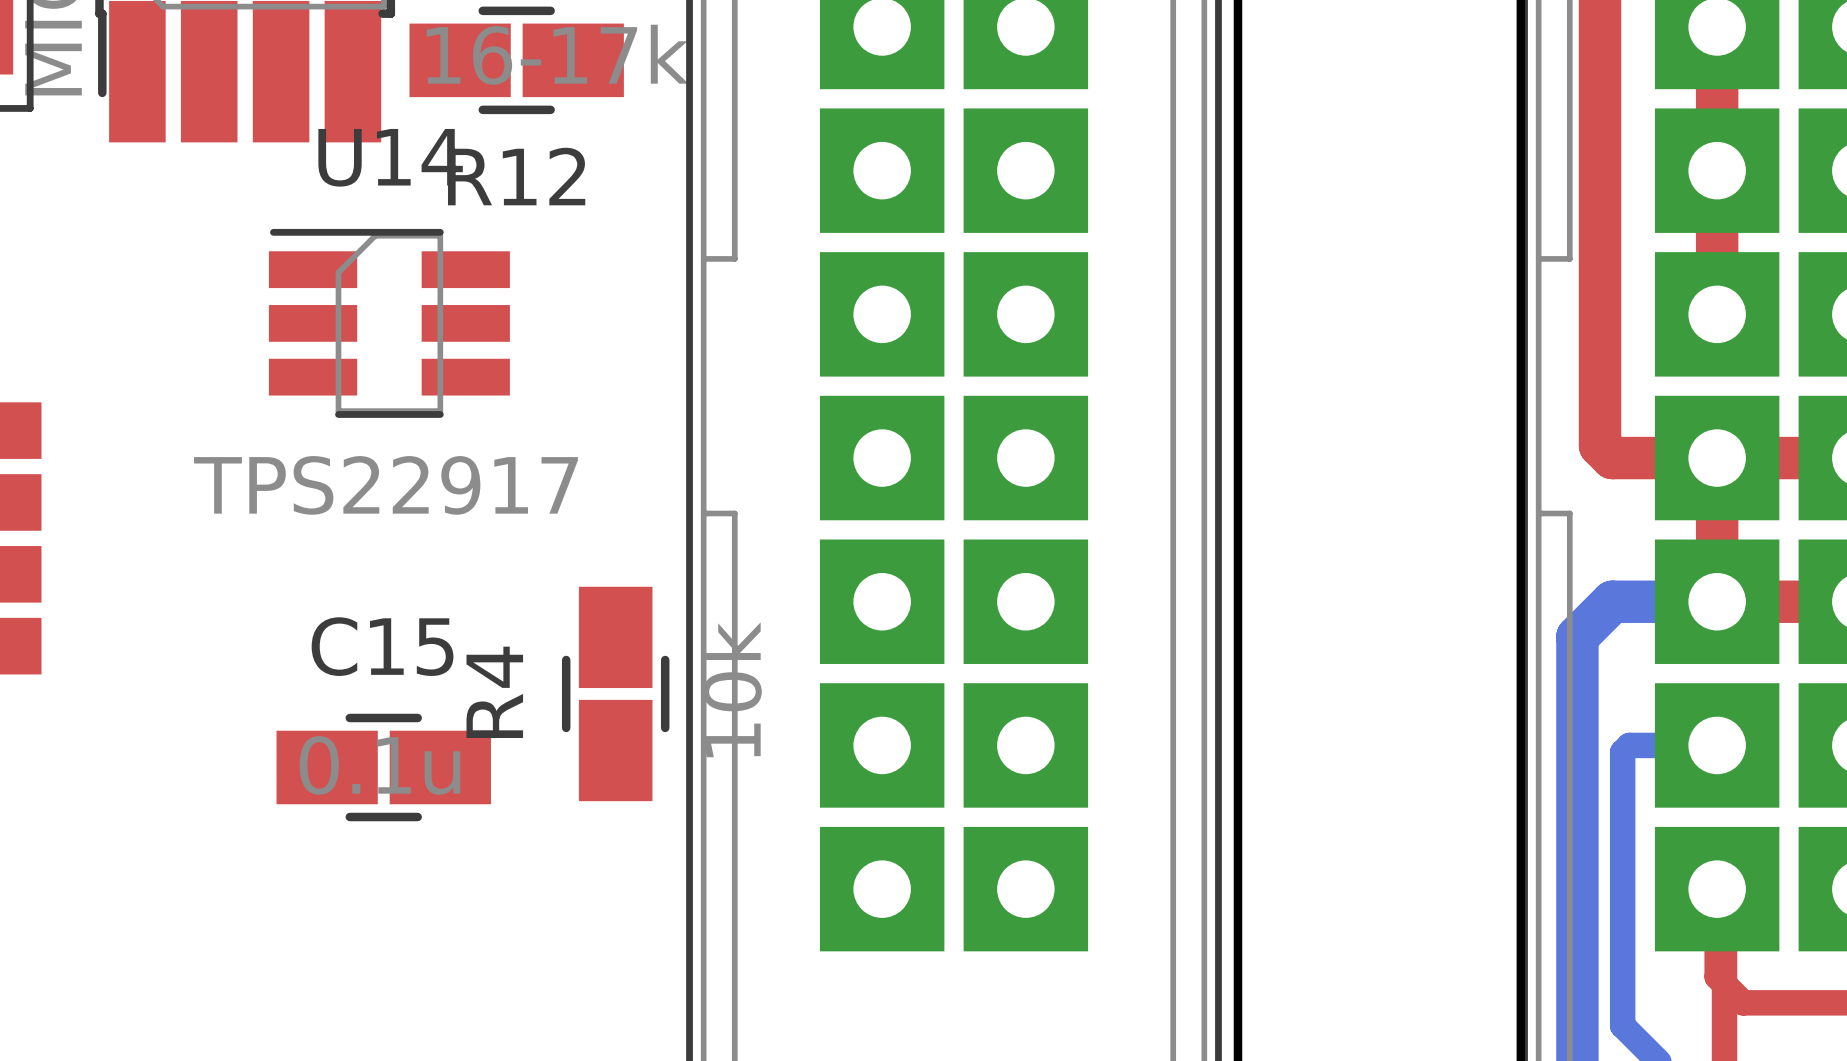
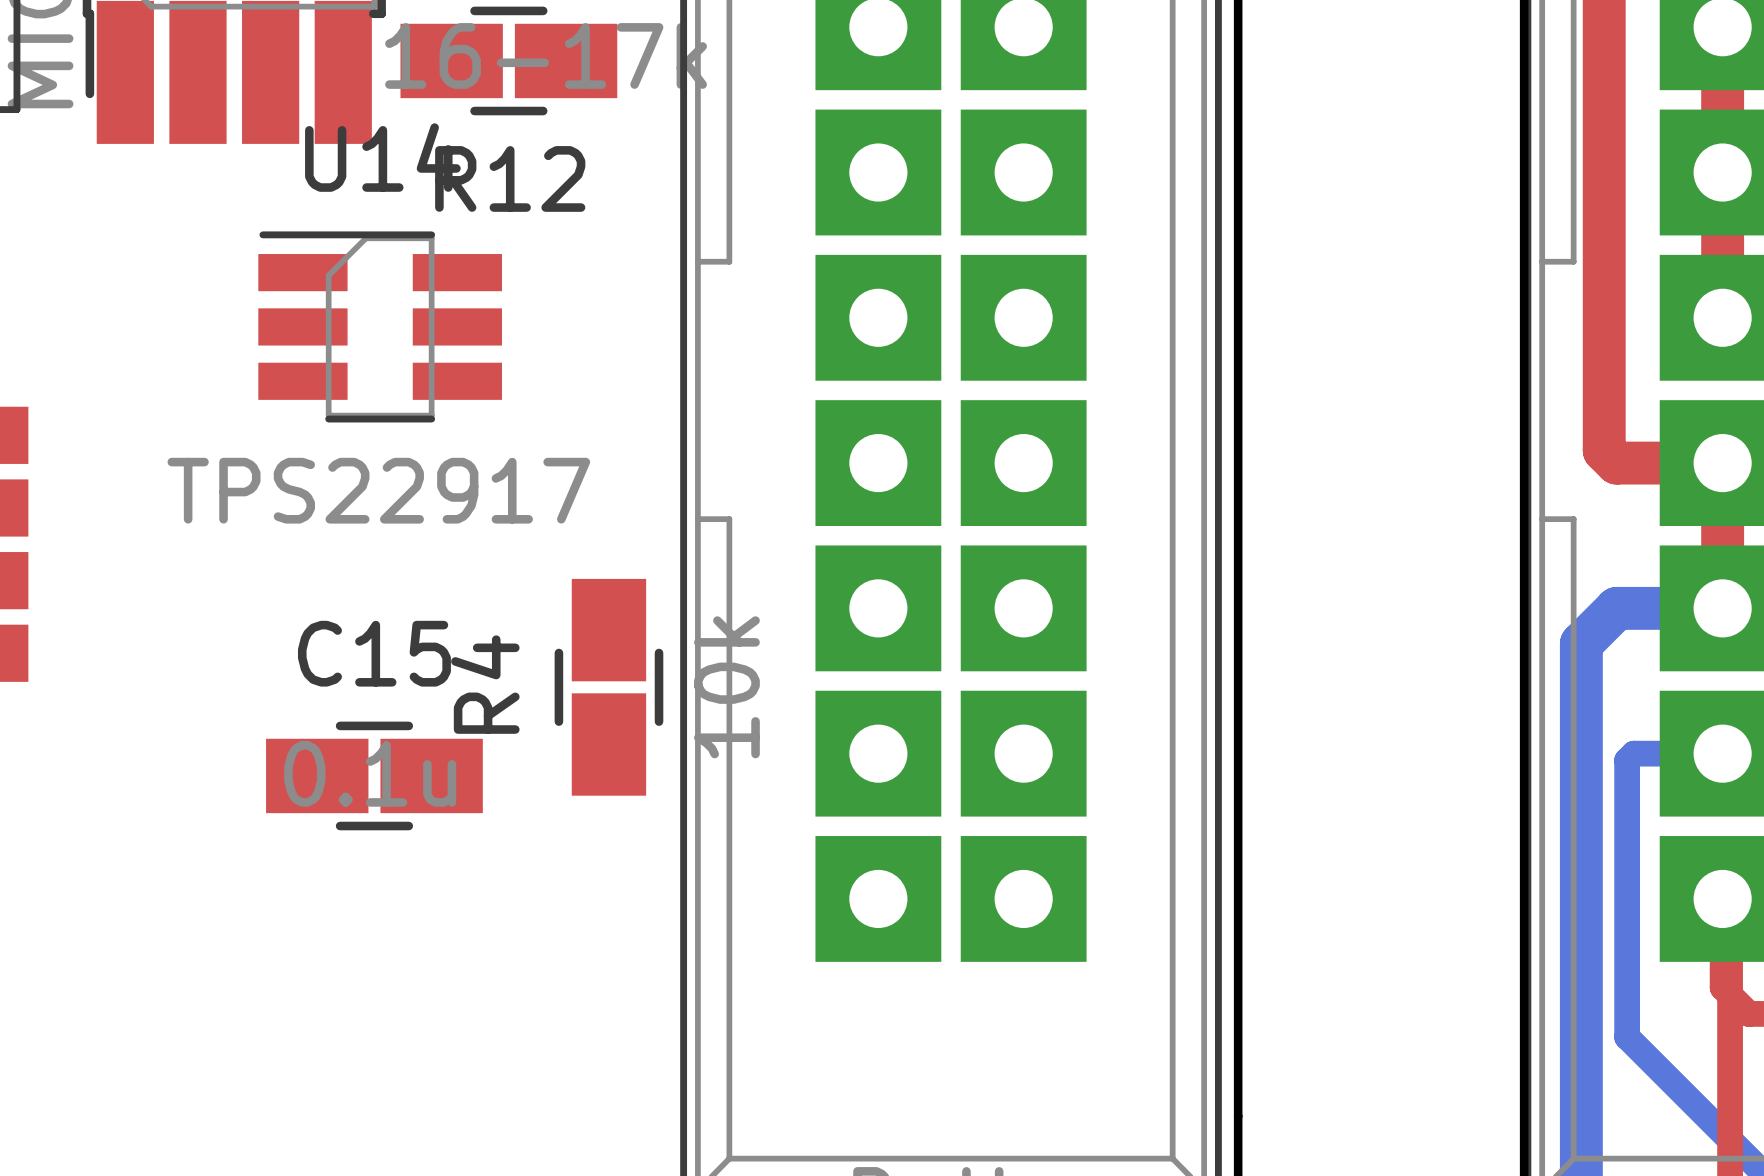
R4 position: (615, 693) -> (608, 687)

